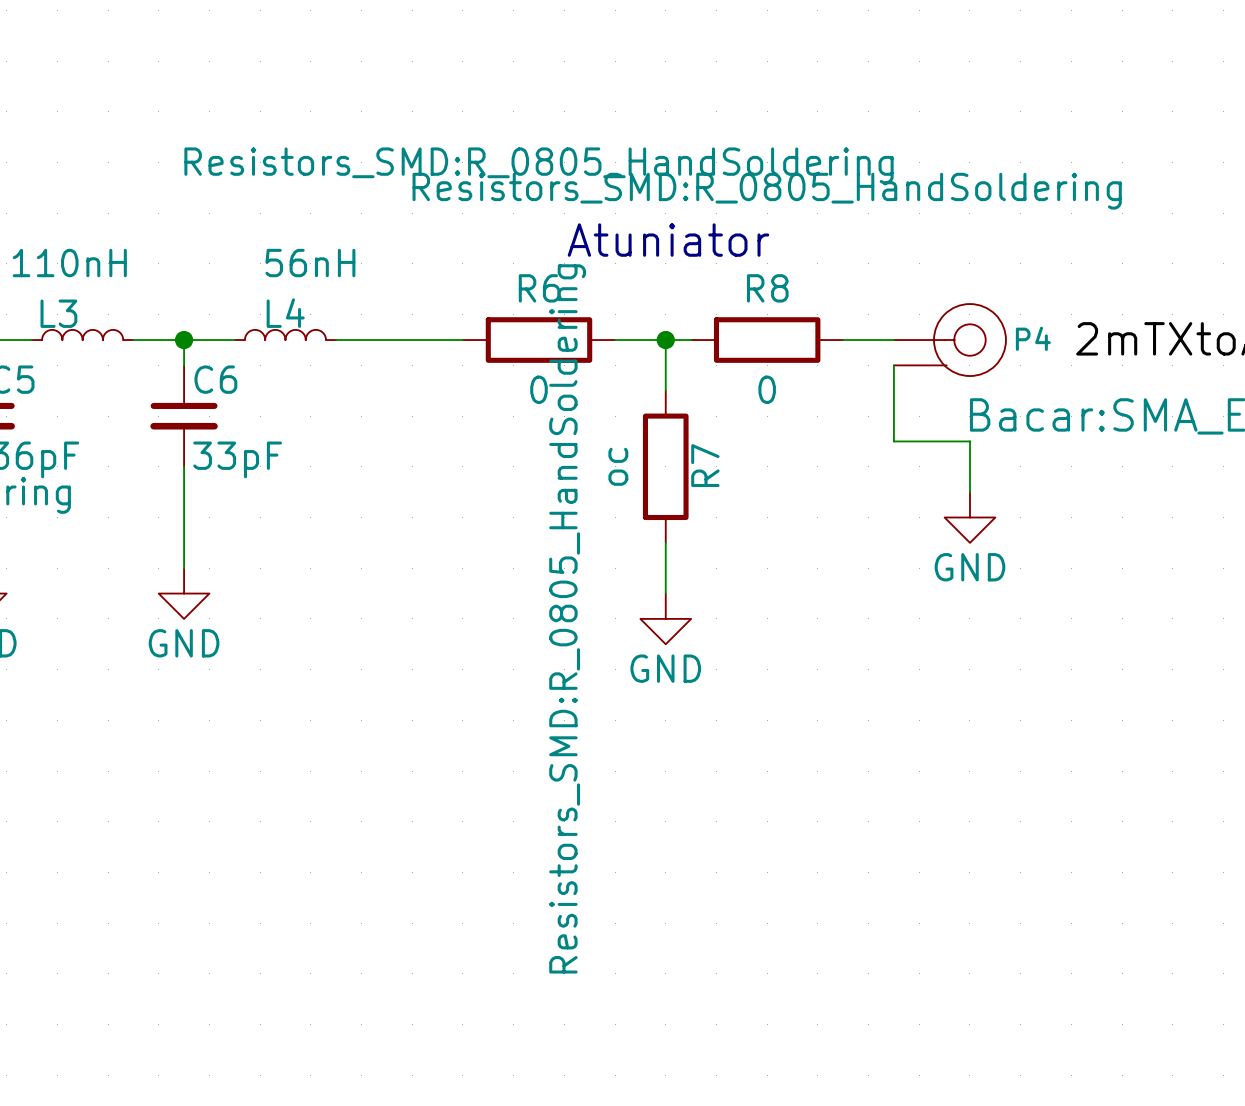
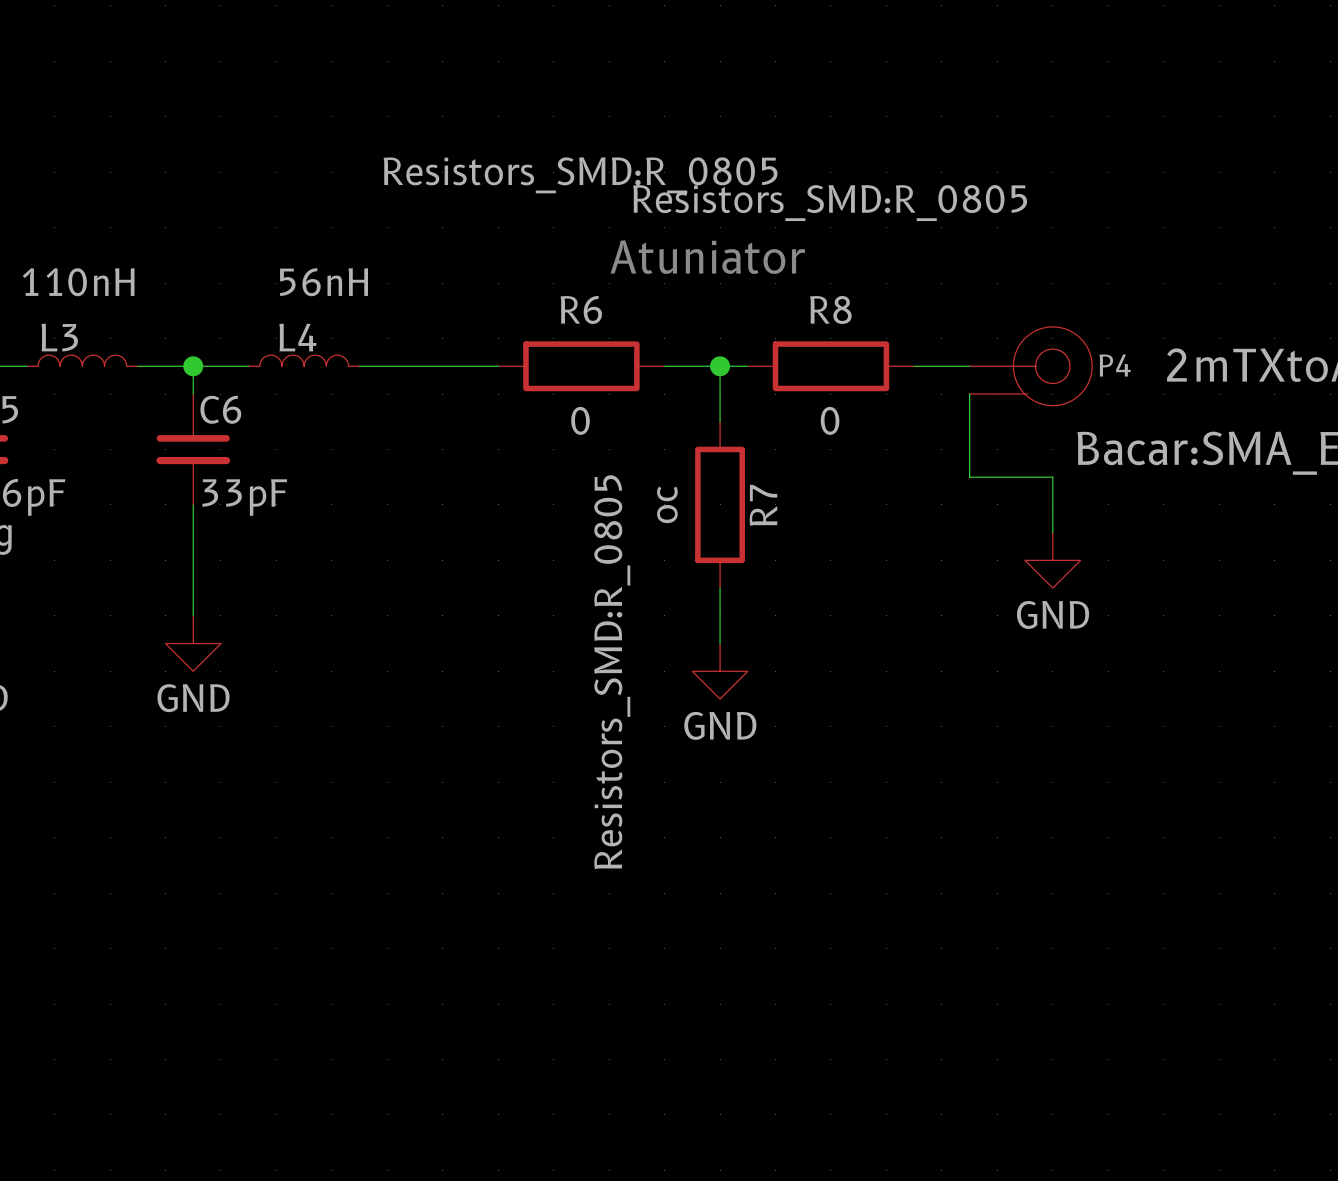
R6 text: Resistors_SMD:R_0805_HandSoldering (539, 165) -> Resistors_SMD:R_0805 (580, 175)
R8 text: Resistors_SMD:R_0805_HandSoldering (767, 191) -> Resistors_SMD:R_0805 (830, 203)
R7 text: Resistors_SMD:R_0805_HandSoldering (567, 618) -> Resistors_SMD:R_0805 (612, 672)

